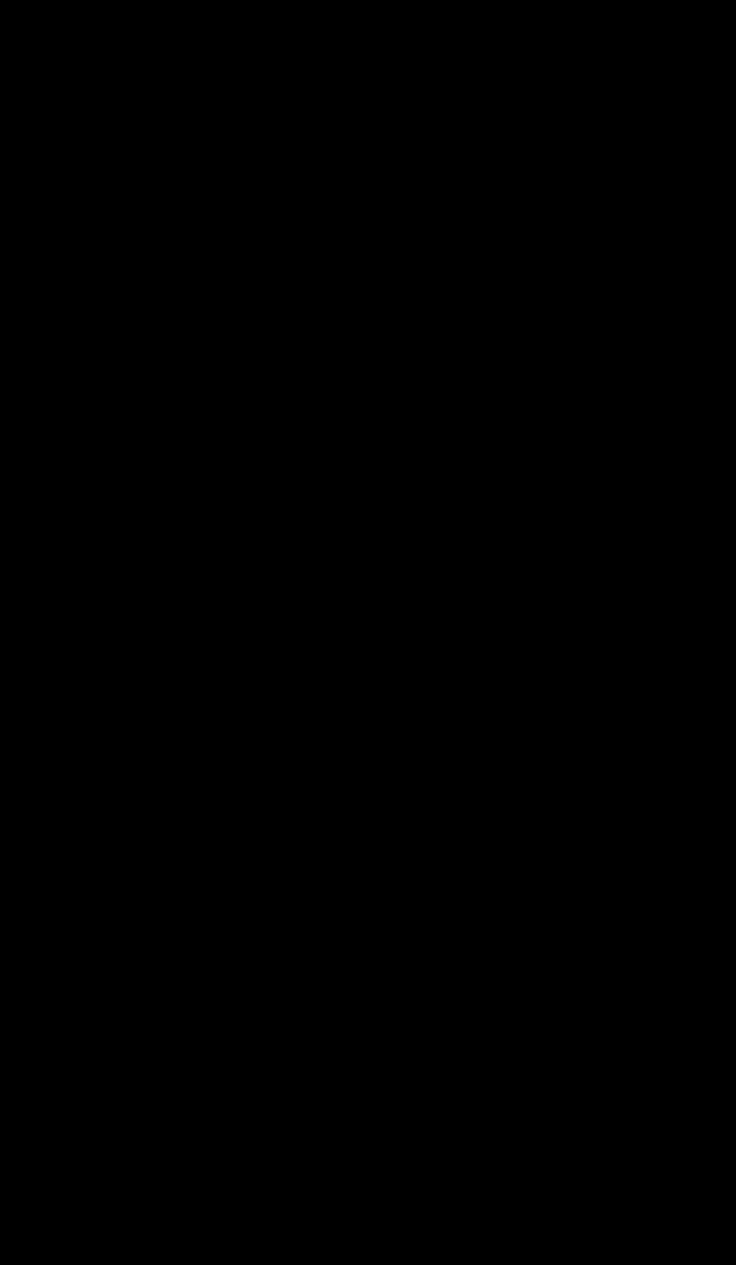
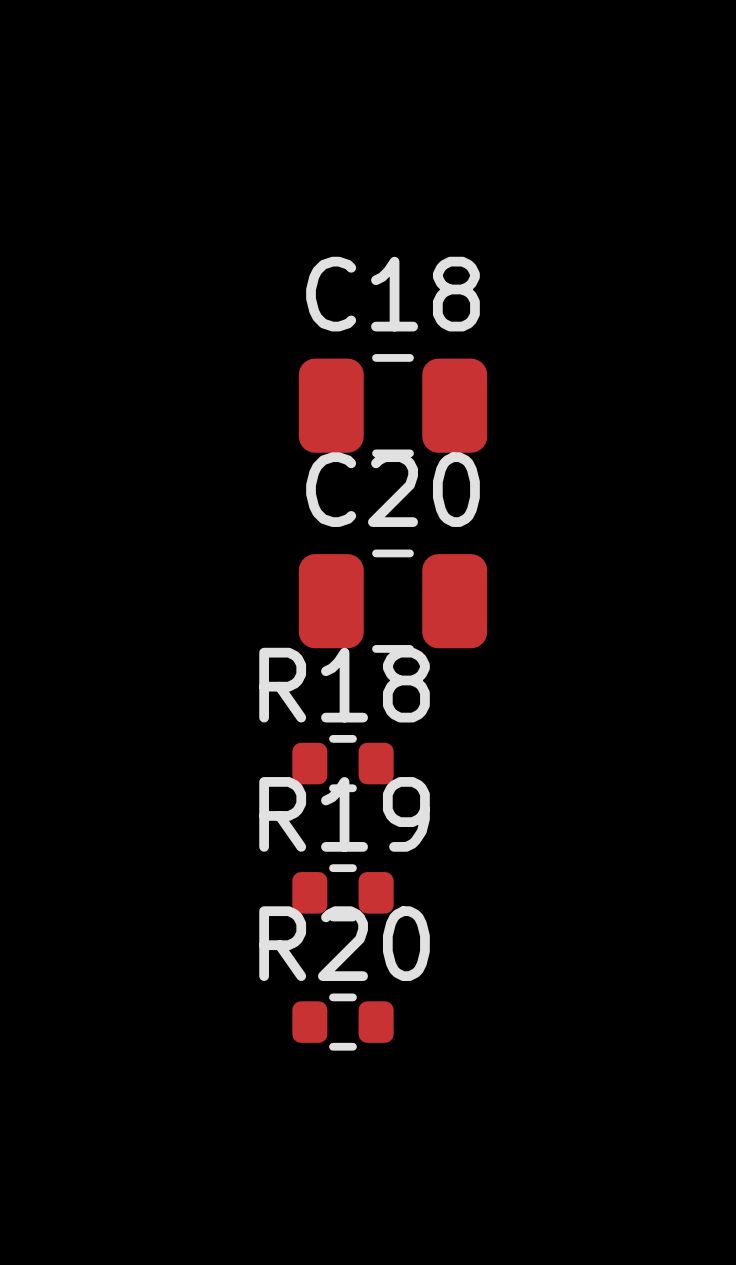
C18: none -> (393, 405)
C20: none -> (393, 601)
R18: none -> (342, 763)
R19: none -> (342, 892)
R20: none -> (342, 1022)

